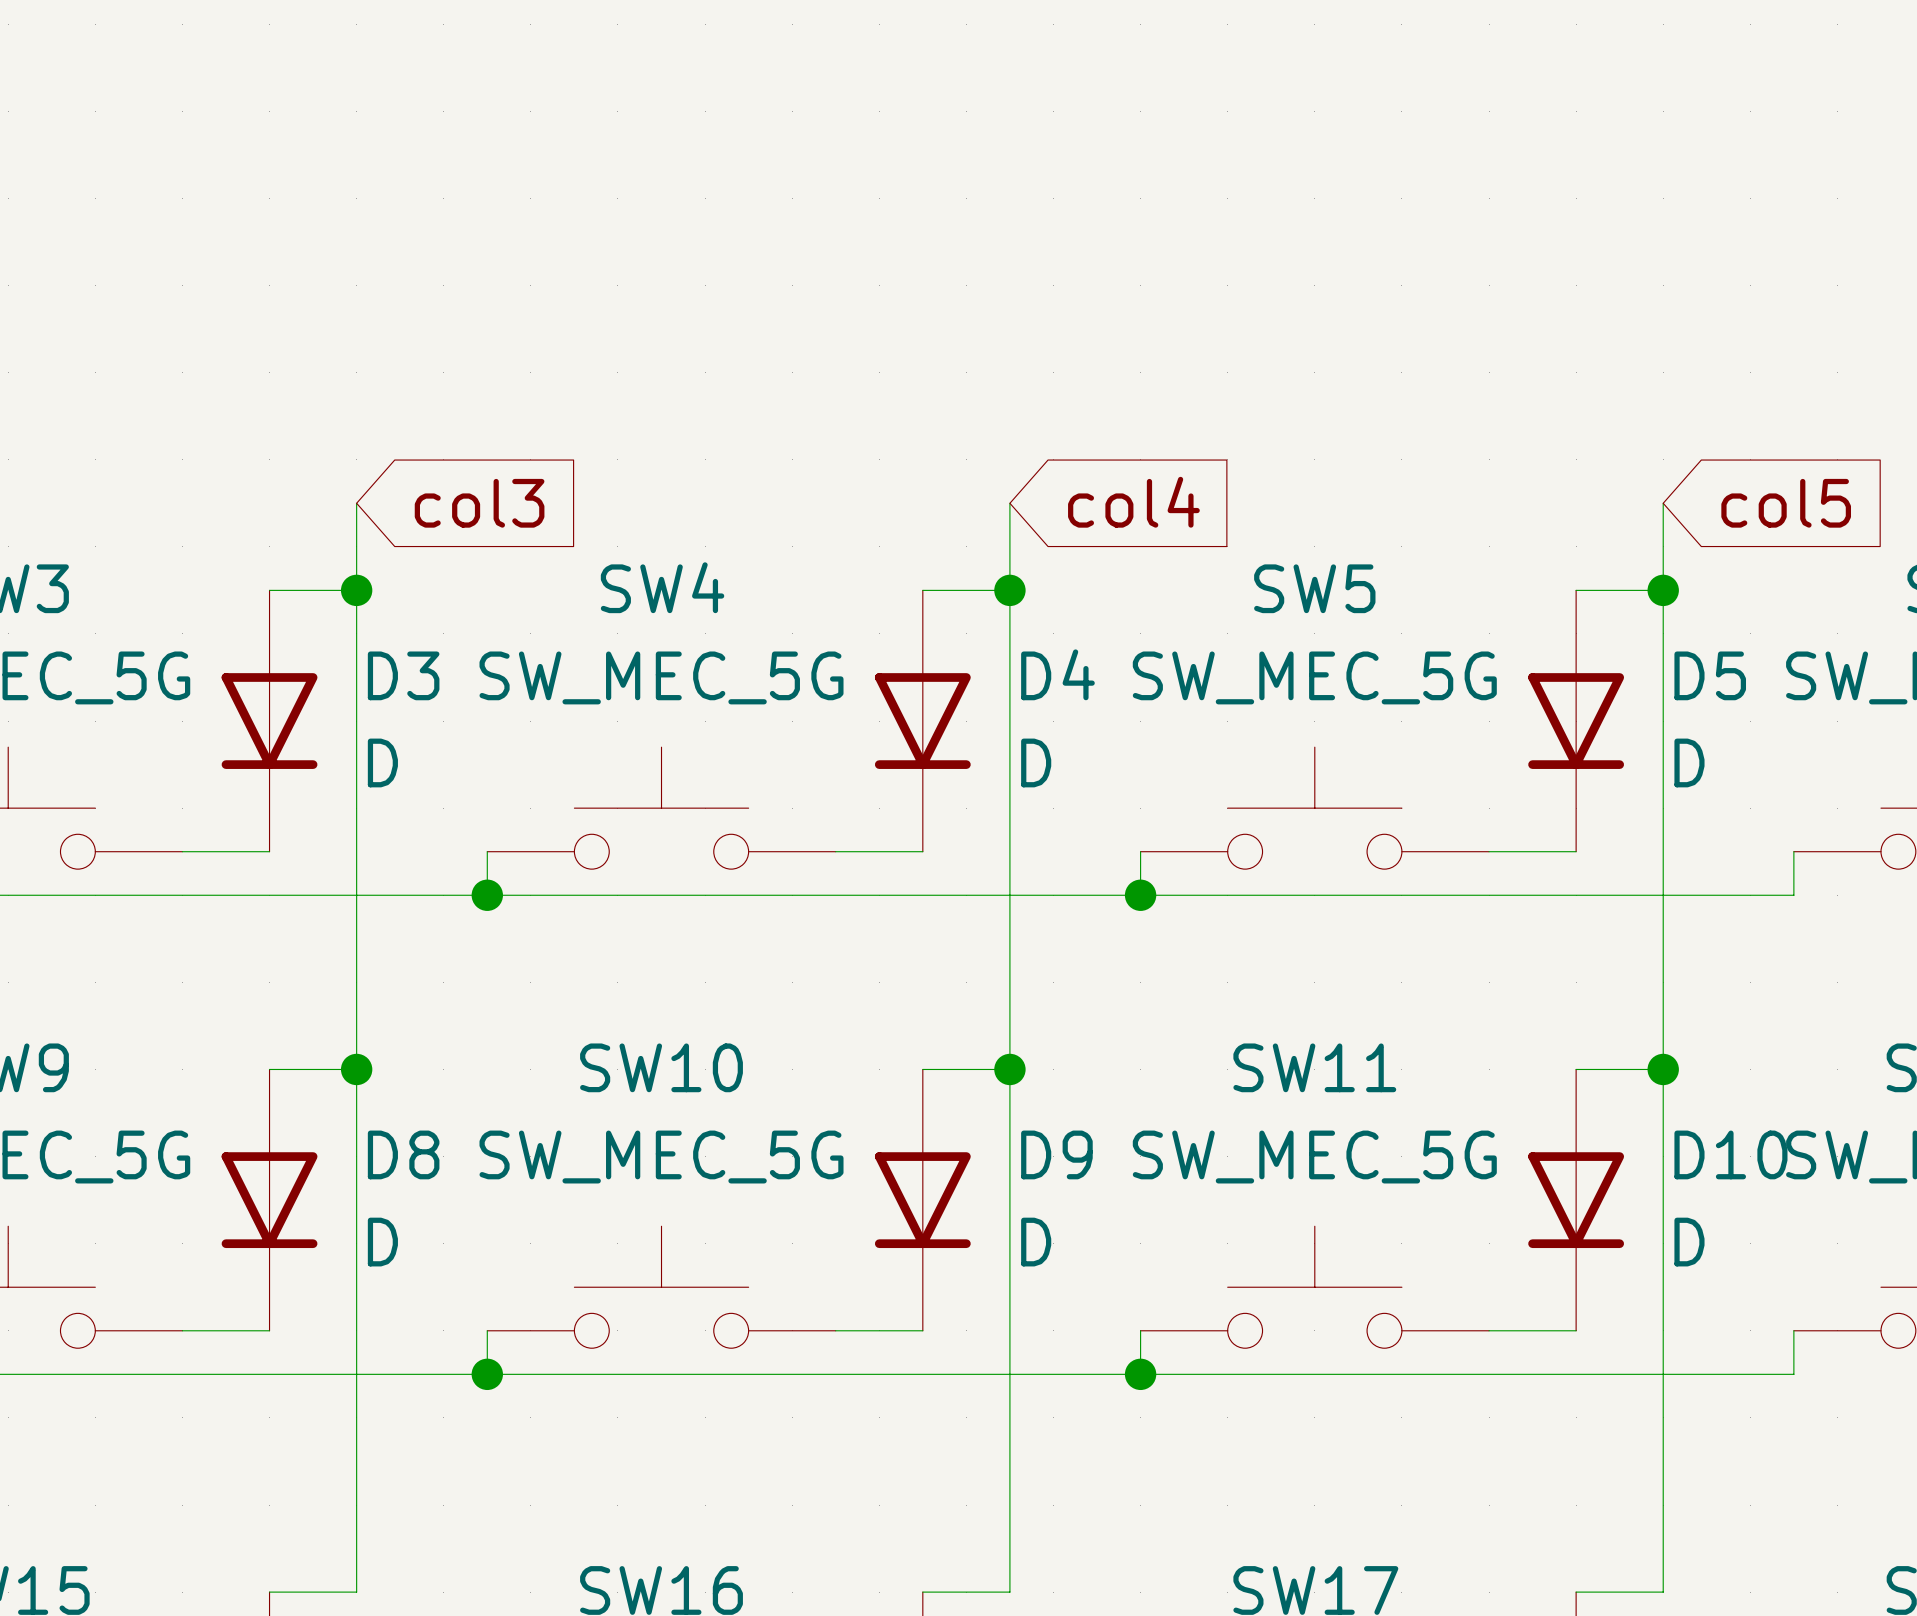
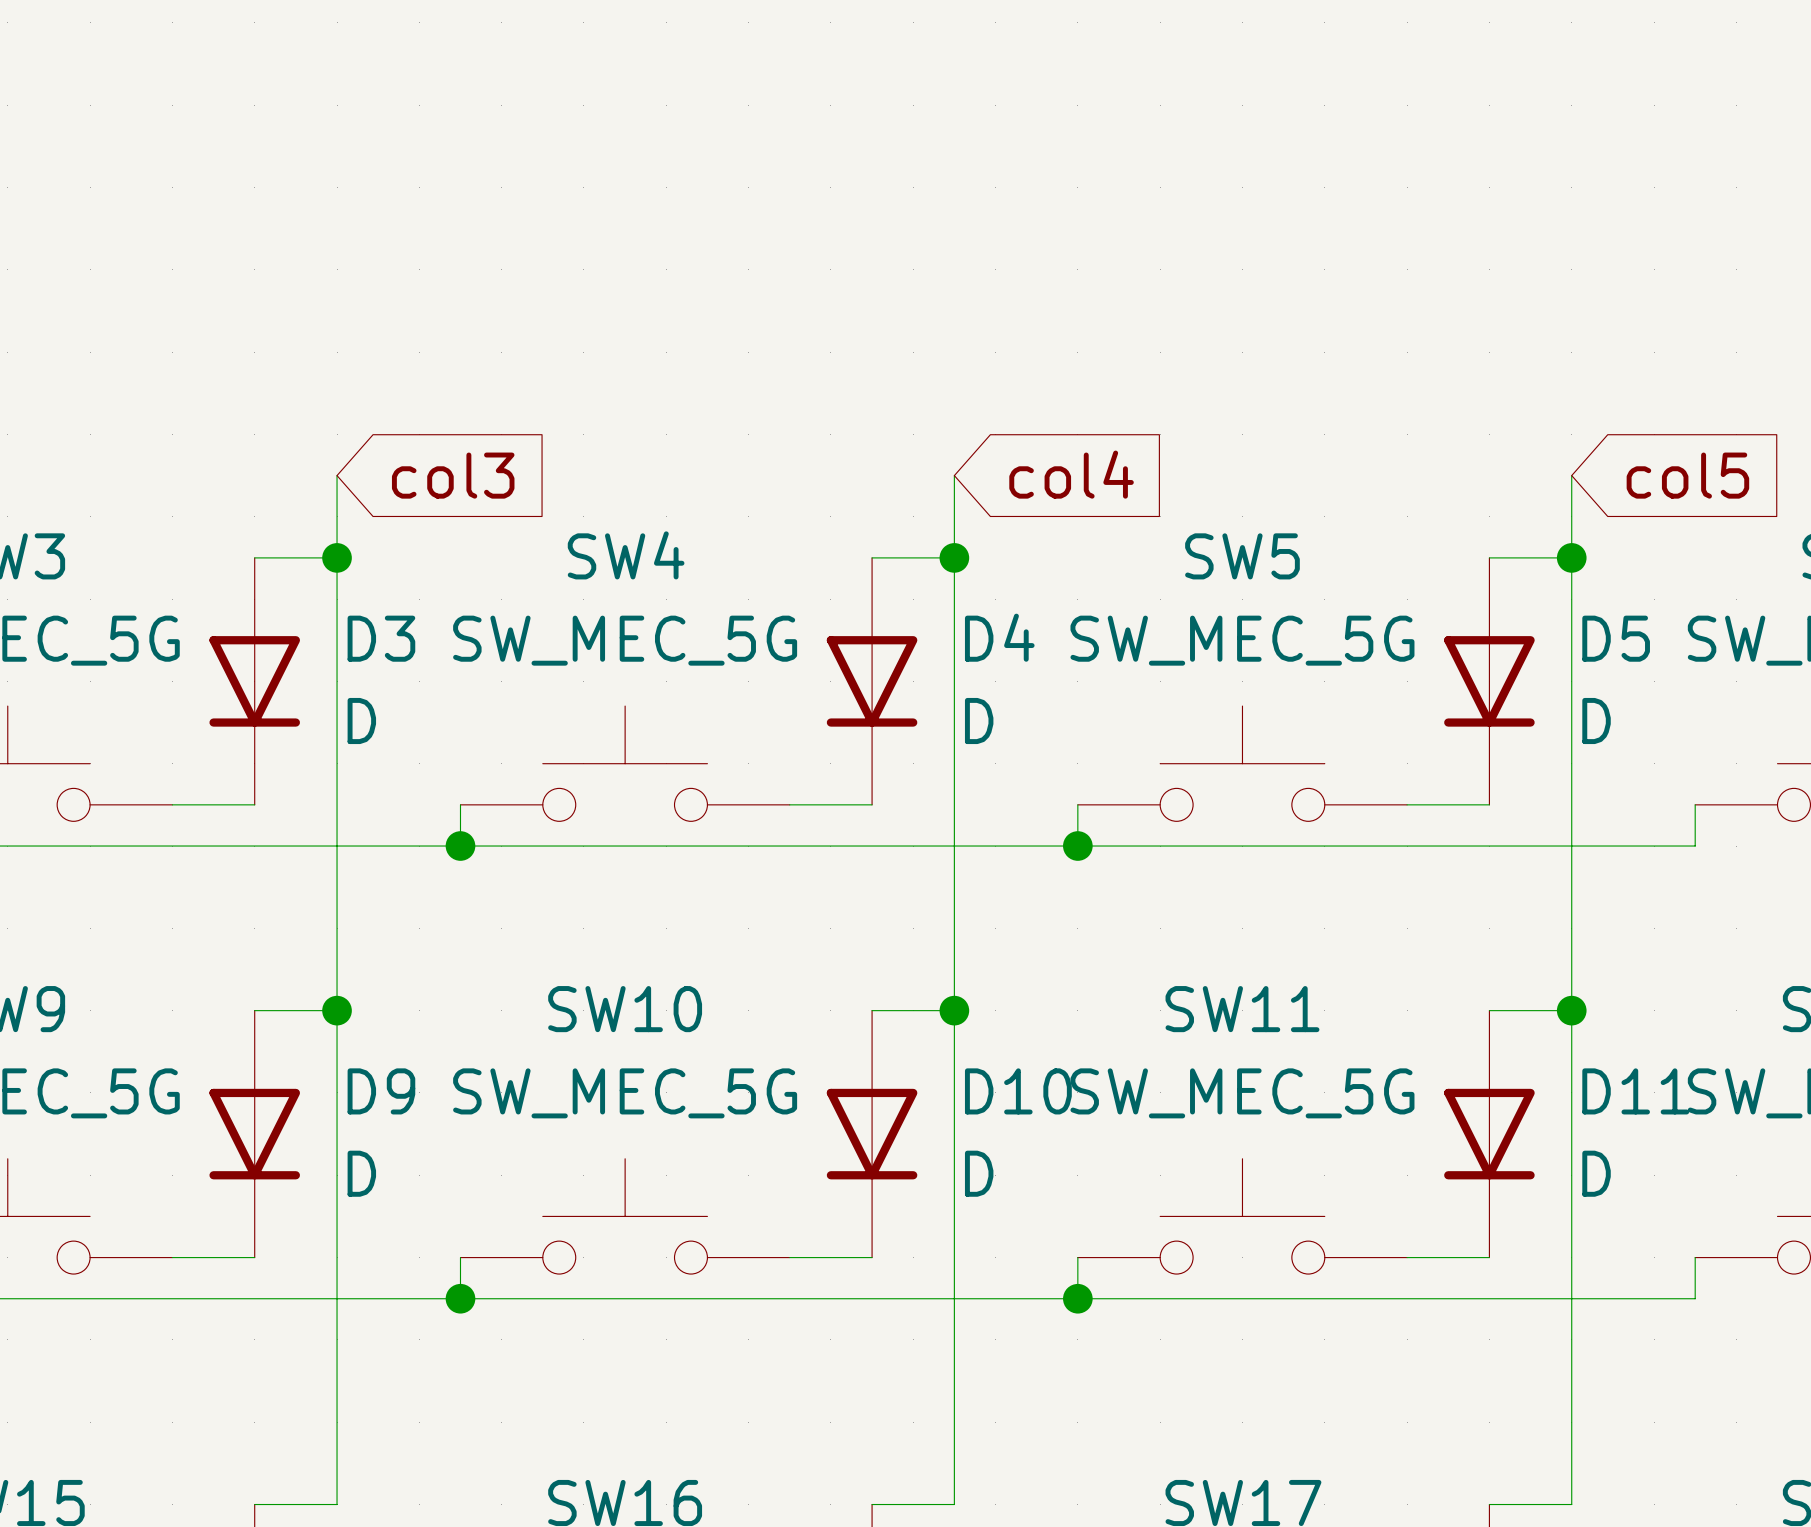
D8 name: D8 (403, 1154) -> D9 (381, 1091)
D9 name: D9 (1056, 1154) -> D10 (1018, 1091)
D10 name: D10 (1730, 1154) -> D11 (1635, 1091)

